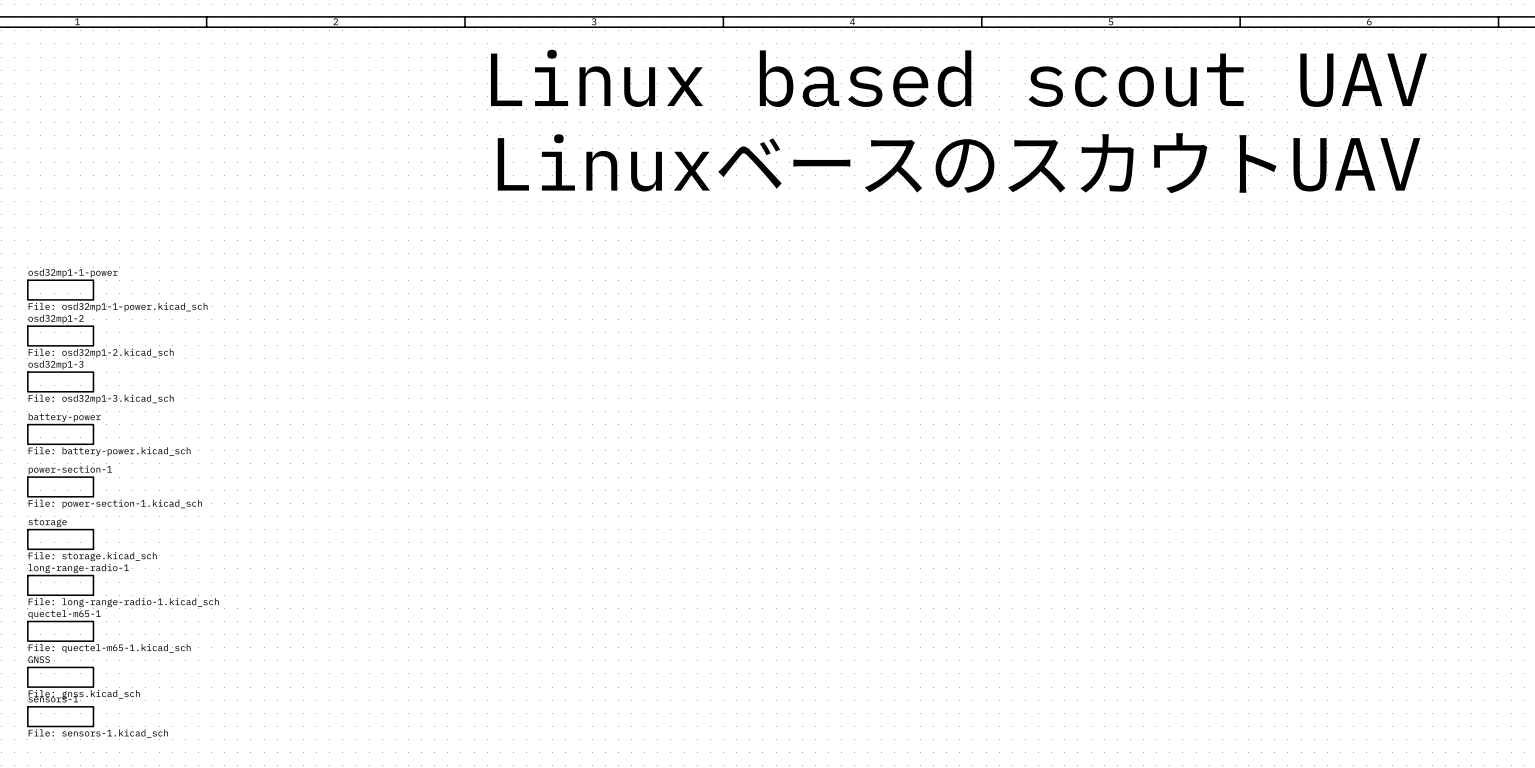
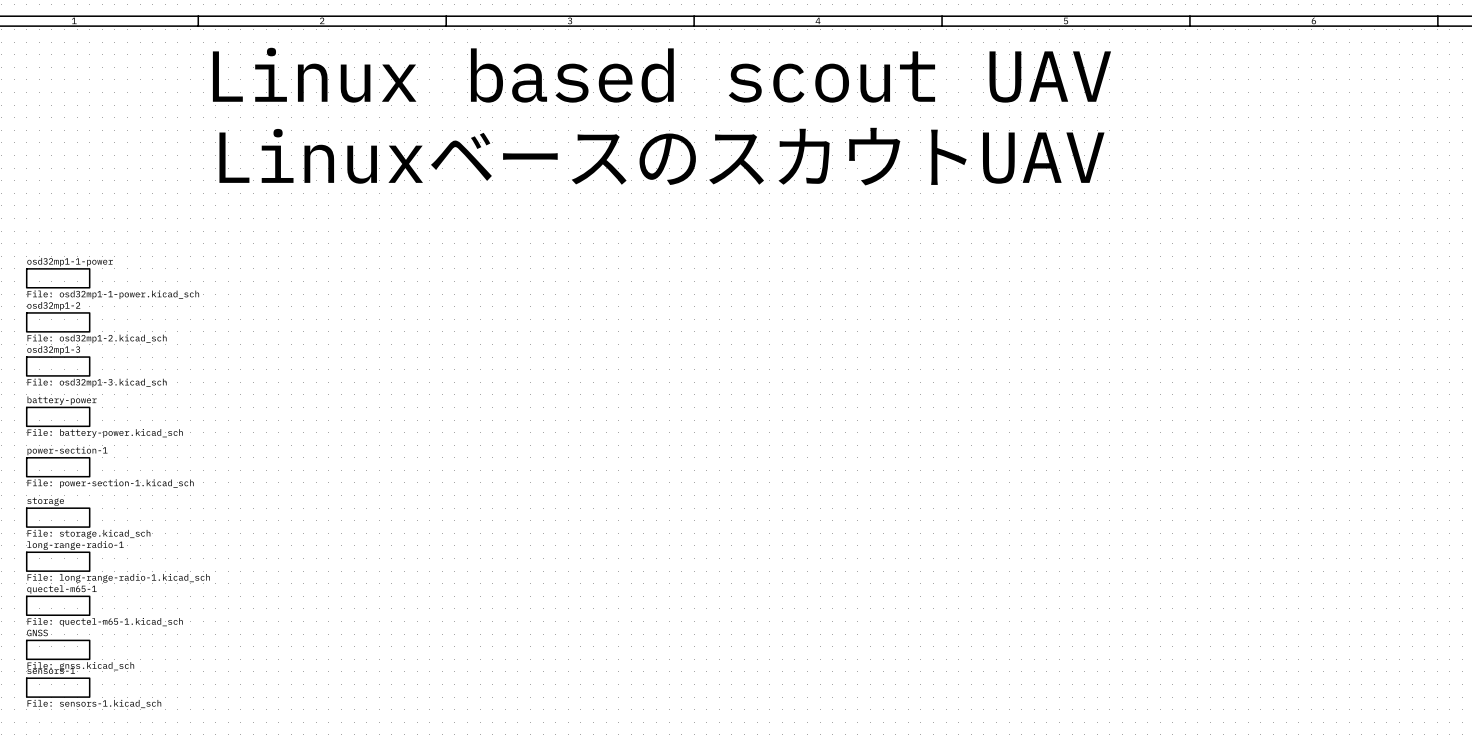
text: none -> Linux based scout UAV (661, 75)
text: Linux based scout UAV (958, 78) -> none
text: none -> LinuxベースのスカウトUAV (661, 156)
text: LinuxベースのスカウトUAV (958, 163) -> none

